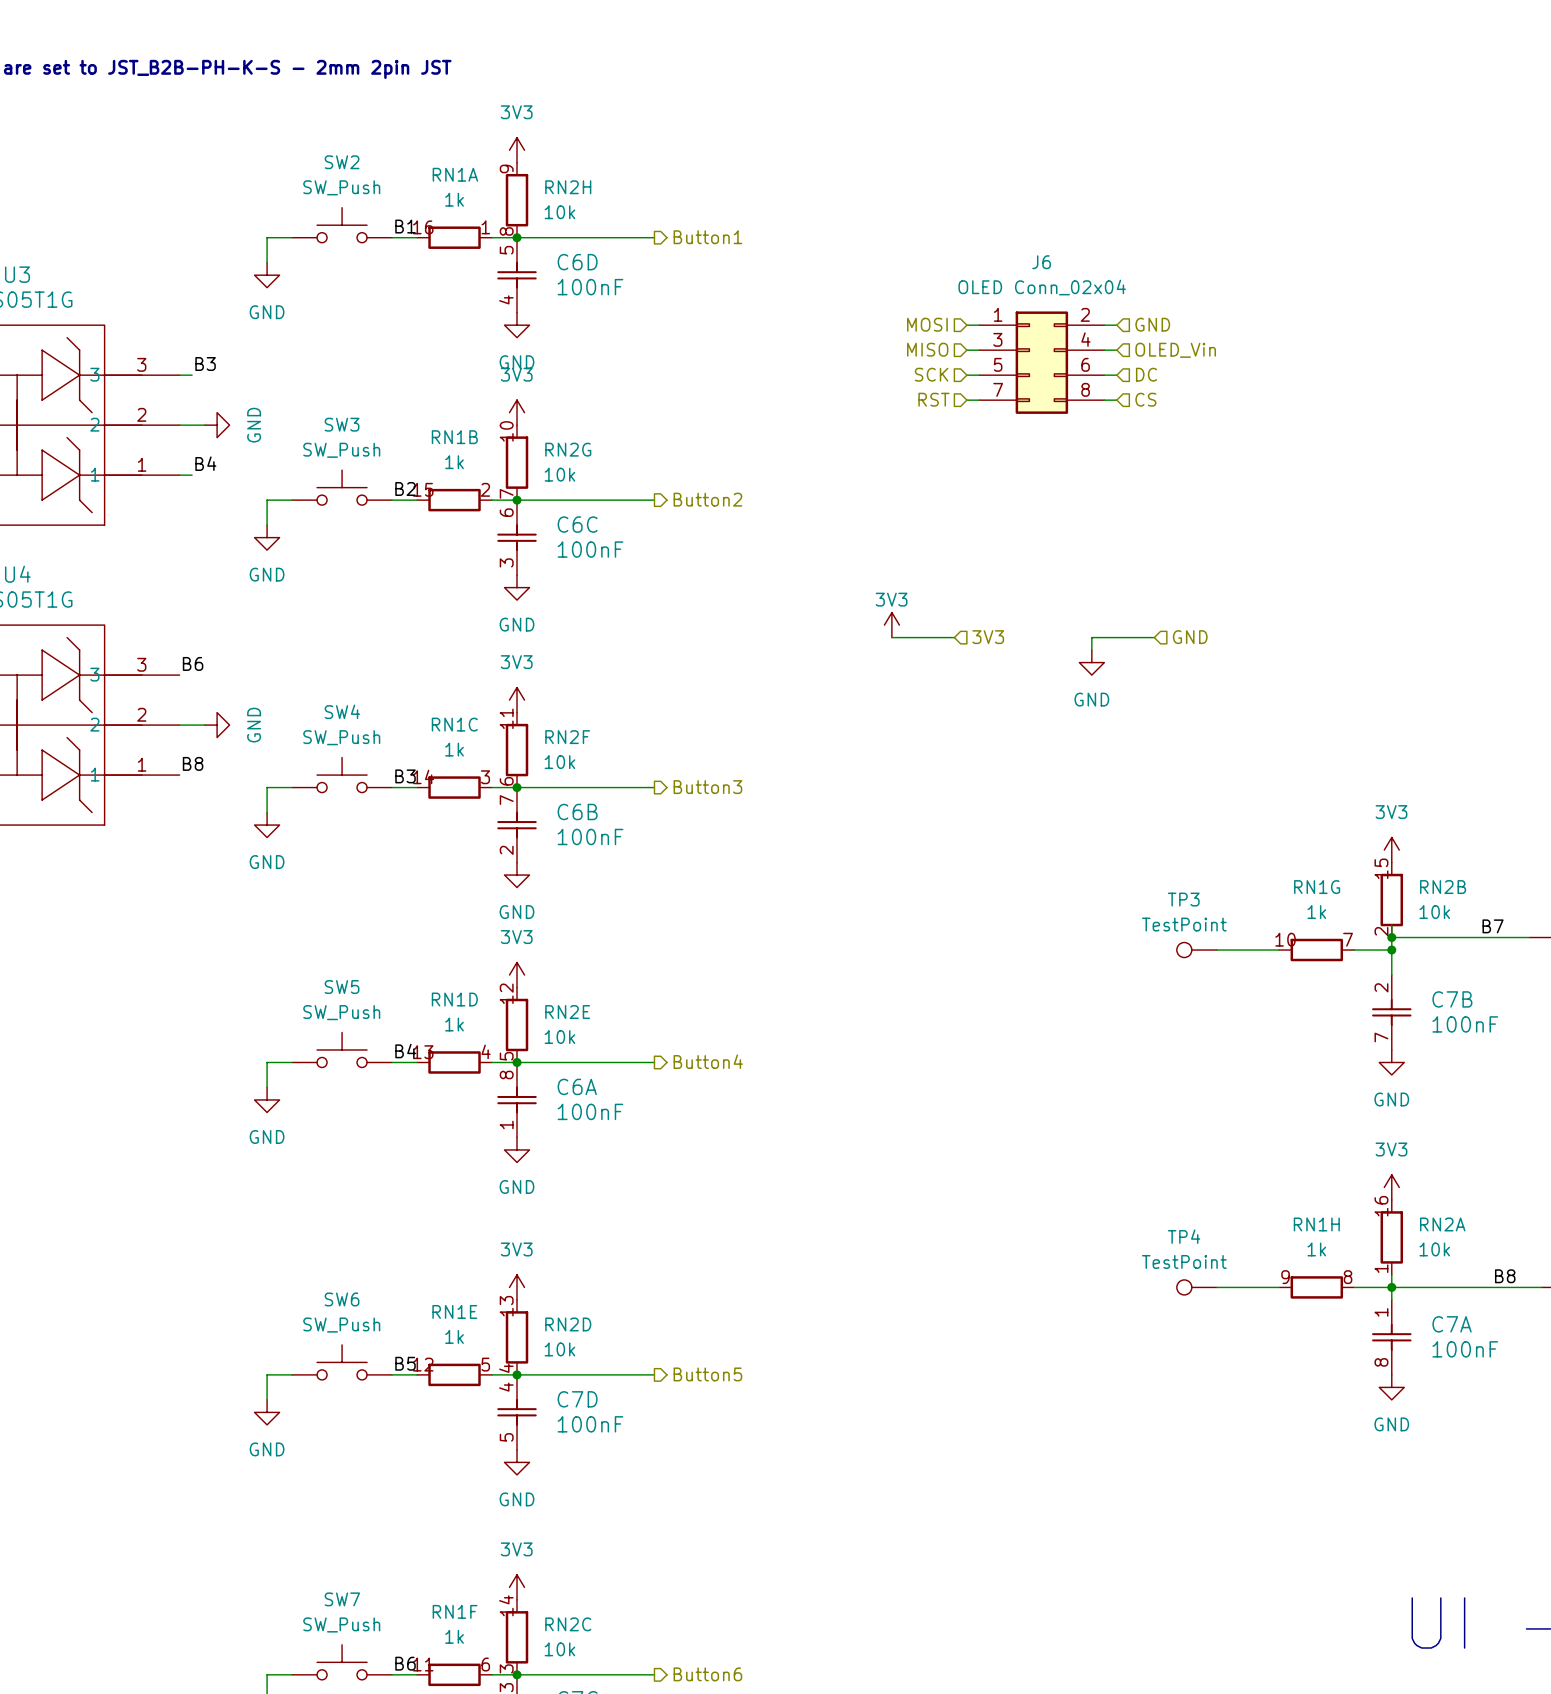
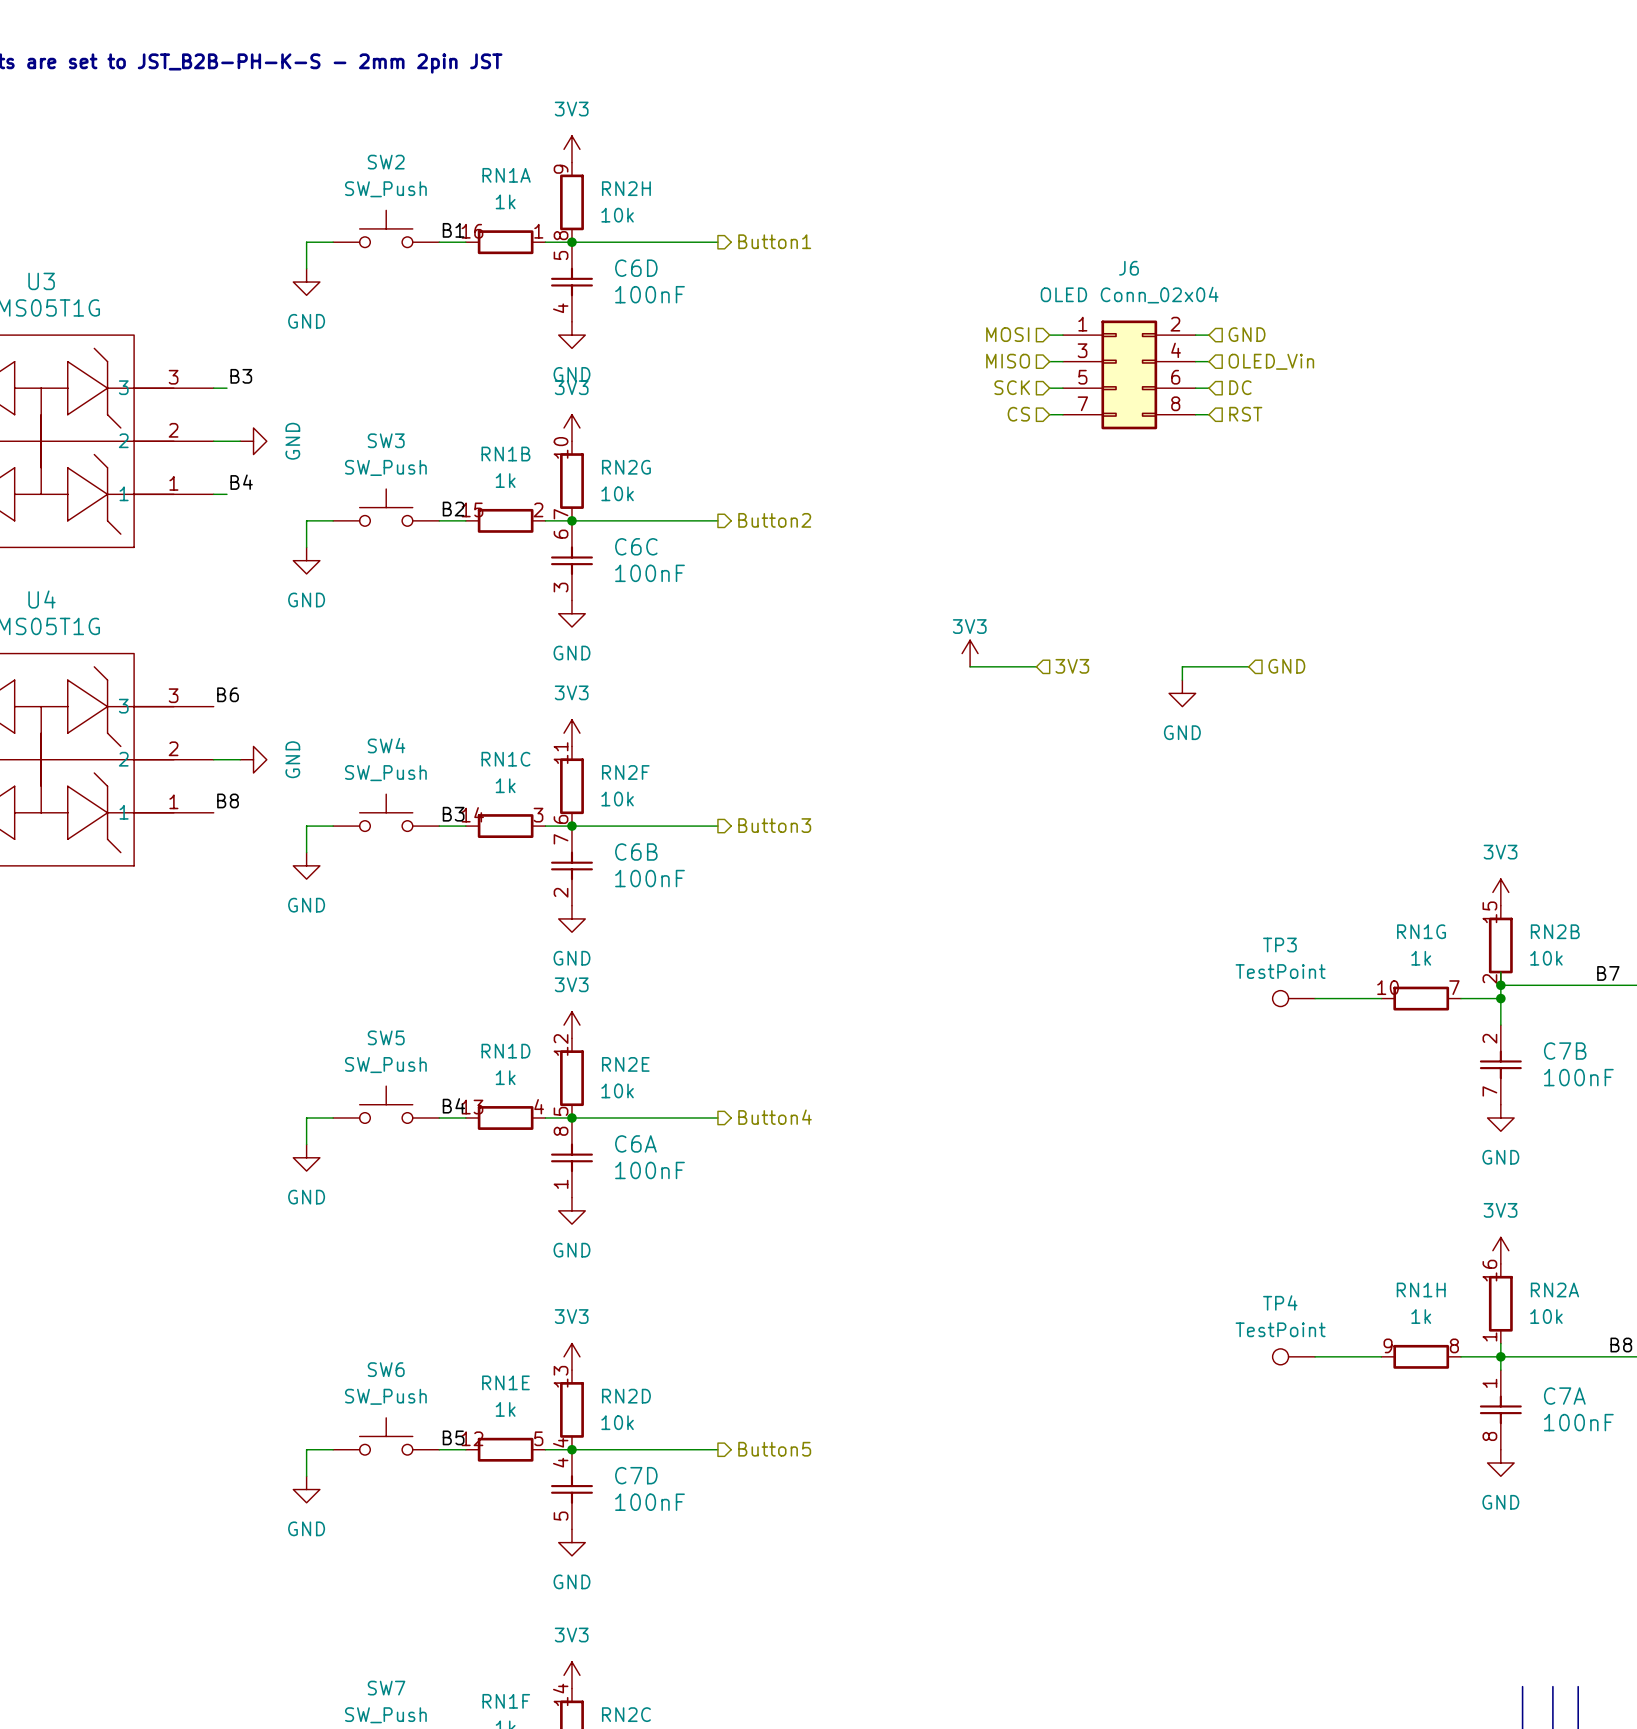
hierarchical label: RST (933, 399) -> CS (1018, 414)
hierarchical label: CS (1145, 399) -> RST (1245, 414)

